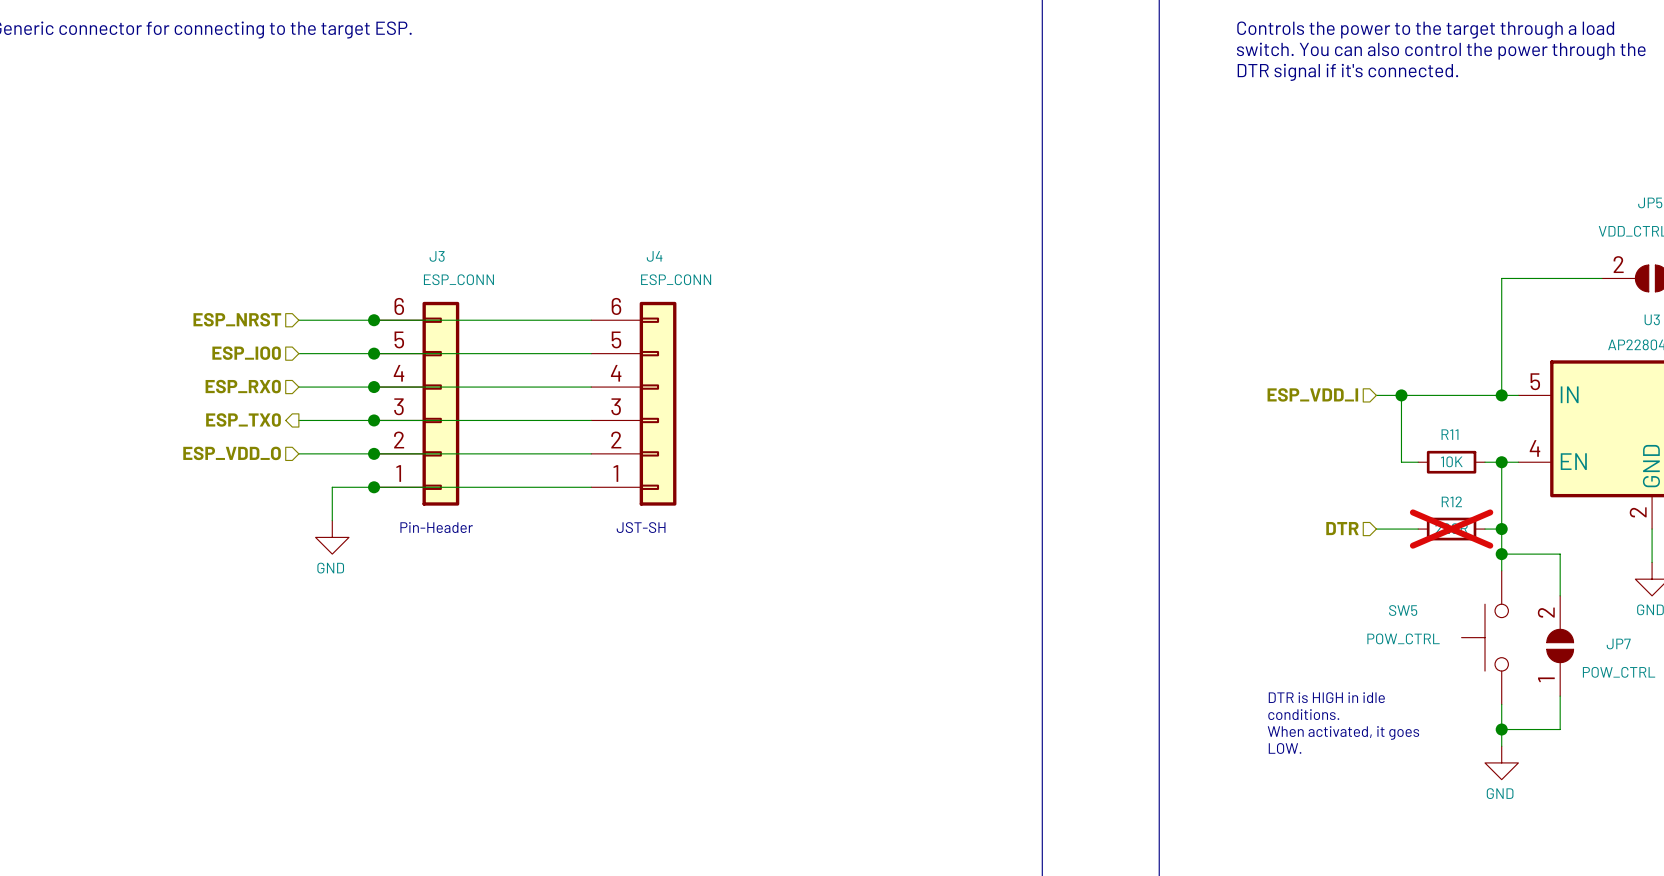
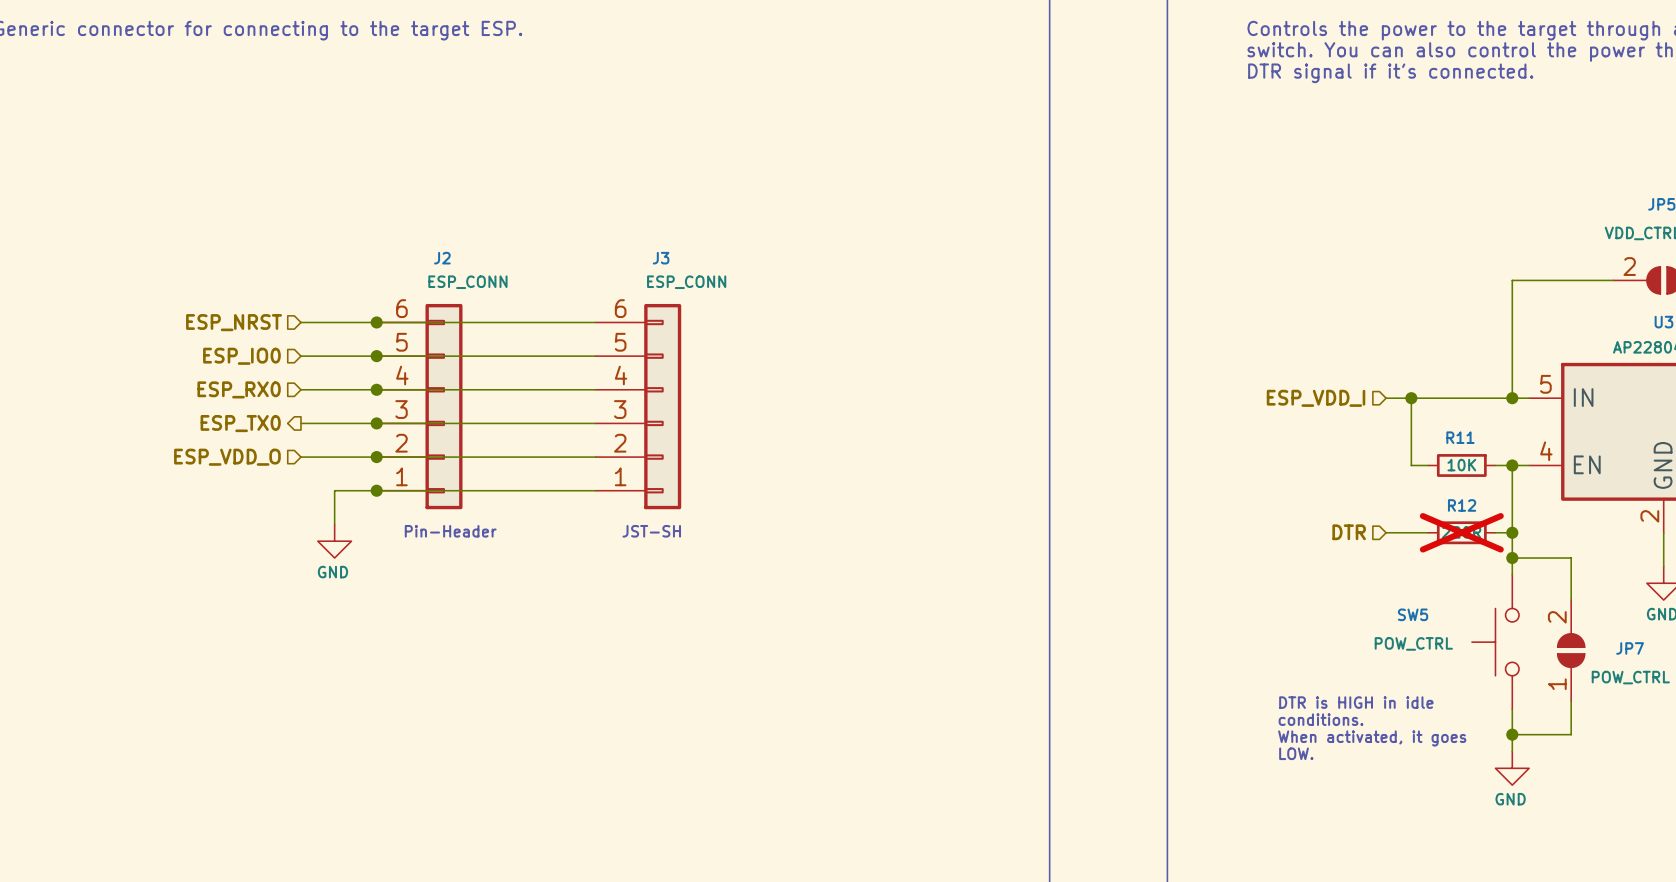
J3 name: J3 (437, 256) -> J2 (442, 258)
J4 name: J4 (654, 256) -> J3 (661, 258)

